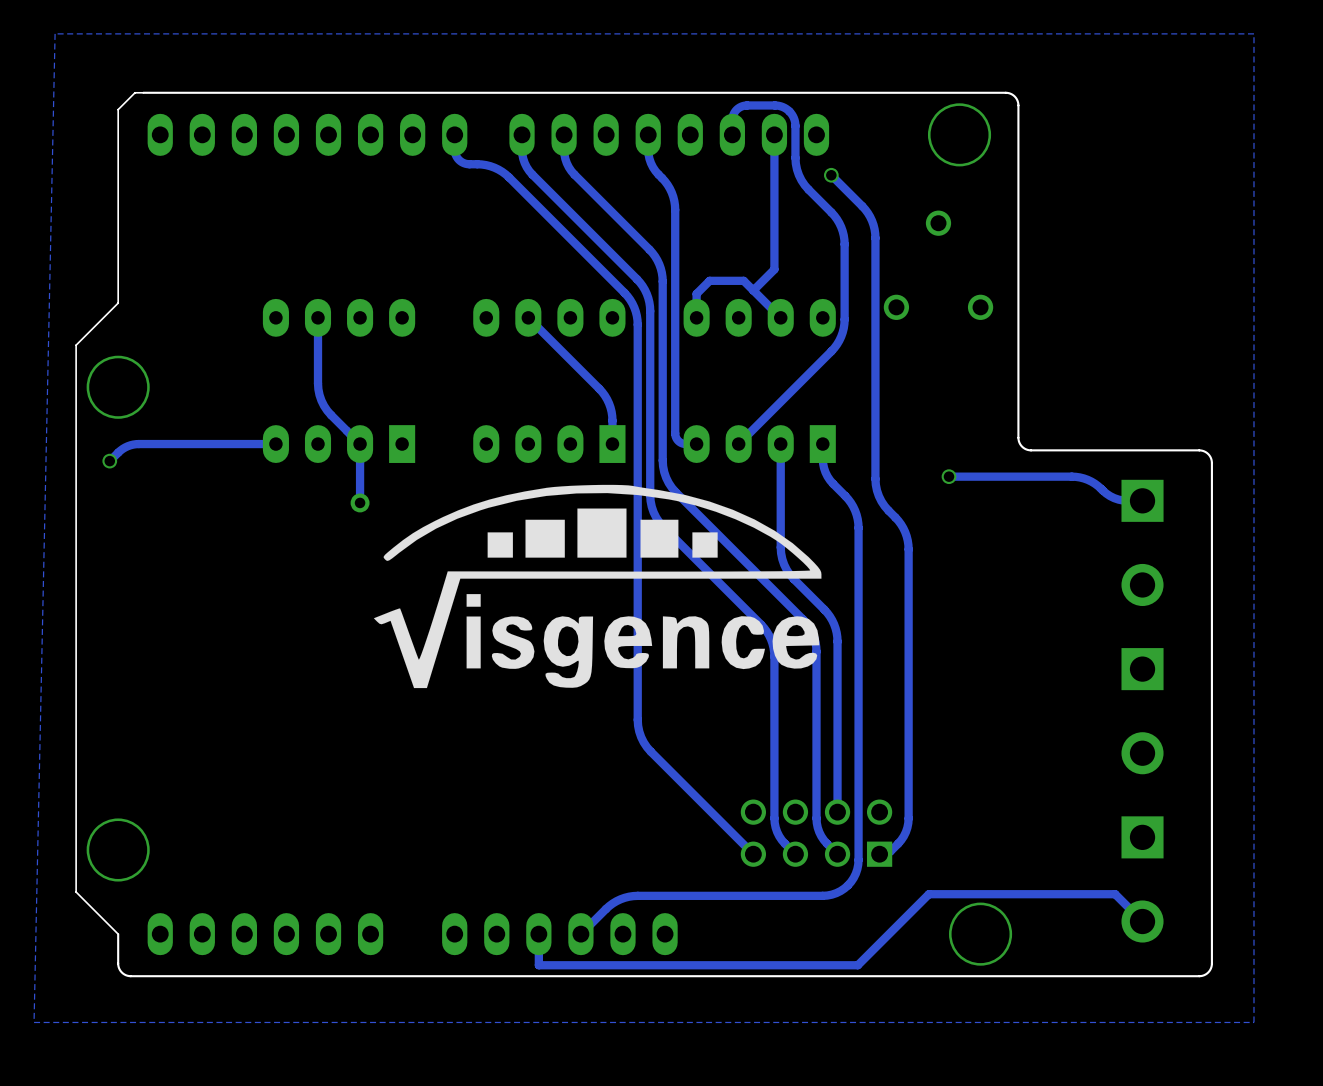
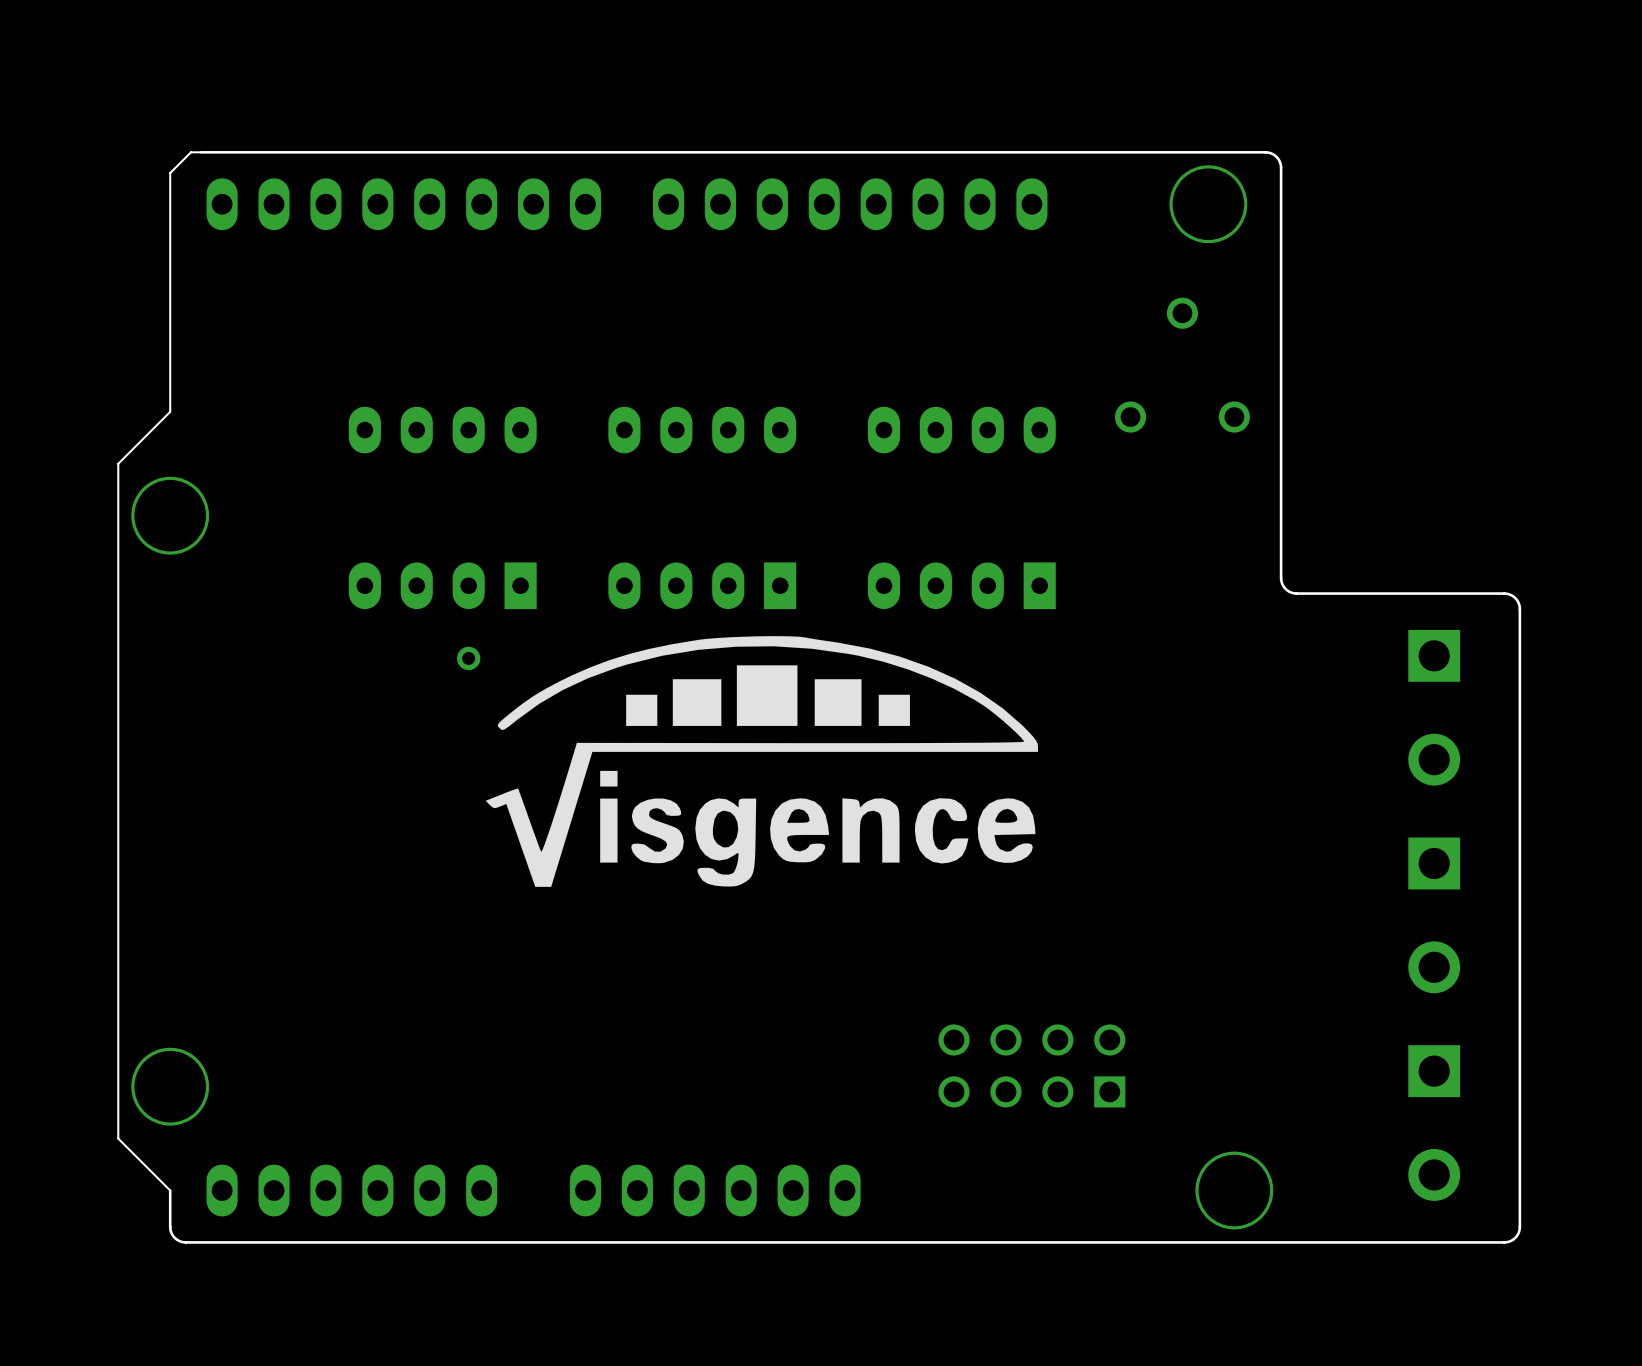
zone outline: (1253, 33) (1253, 1022) (34, 1022) (55, 33) (1253, 33) -> none
track: (454, 134) (454, 151) (459, 159) (465, 163) (490, 166) (505, 174) (624, 292) (634, 307) (637, 324) (639, 731) (643, 742) (650, 751) (753, 854) -> none
track: (522, 134) (523, 158) (529, 171) (637, 279) (646, 293) (650, 311) (651, 506) (656, 517) (663, 526) (761, 624) (770, 639) (774, 656) (774, 822) (779, 836) (795, 854) -> none
track: (564, 134) (565, 158) (571, 171) (649, 249) (660, 268) (662, 281) (662, 460) (664, 472) (668, 483) (803, 619) (813, 634) (816, 651) (816, 822) (821, 836) (837, 854) -> none
track: (648, 134) (648, 154) (650, 163) (669, 188) (674, 205) (675, 434) (681, 443) (696, 444) -> none
track: (732, 134) (732, 116) (741, 106) (776, 105) (789, 111) (795, 121) (795, 163) (798, 175) (804, 185) (837, 219) (842, 231) (844, 244) (844, 323) (839, 340) (831, 351) (738, 444) -> none
track: (774, 134) (774, 269) (753, 290) -> none
track: (831, 175) (865, 209) (874, 229) (875, 484) (881, 501) (903, 528) (908, 544) (908, 823) (903, 836) (898, 843) (888, 852) (879, 854) -> none
via: (831, 175) -> none
track: (318, 317) (319, 394) (327, 410) (349, 434) (356, 445) (359, 458) (360, 502) -> none
track: (528, 317) (604, 395) (611, 411) (612, 444) -> none
track: (780, 317) (743, 280) (709, 280) (696, 293) (696, 317) -> none
track: (275, 444) (136, 444) (122, 448) (109, 461) -> none
track: (780, 444) (782, 559) (790, 574) (829, 616) (836, 632) (837, 812) -> none
track: (822, 444) (823, 463) (825, 472) (830, 480) (850, 502) (858, 523) (858, 859) (853, 877) (844, 888) (827, 895) (629, 896) (609, 906) (580, 934) -> none
via: (109, 461) -> none
track: (949, 476) (1075, 476) (1091, 481) (1114, 498) (1123, 500) (1142, 500) -> none
via: (949, 476) -> none
track: (1142, 921) (1115, 894) (928, 894) (857, 965) (538, 965) (538, 934) -> none

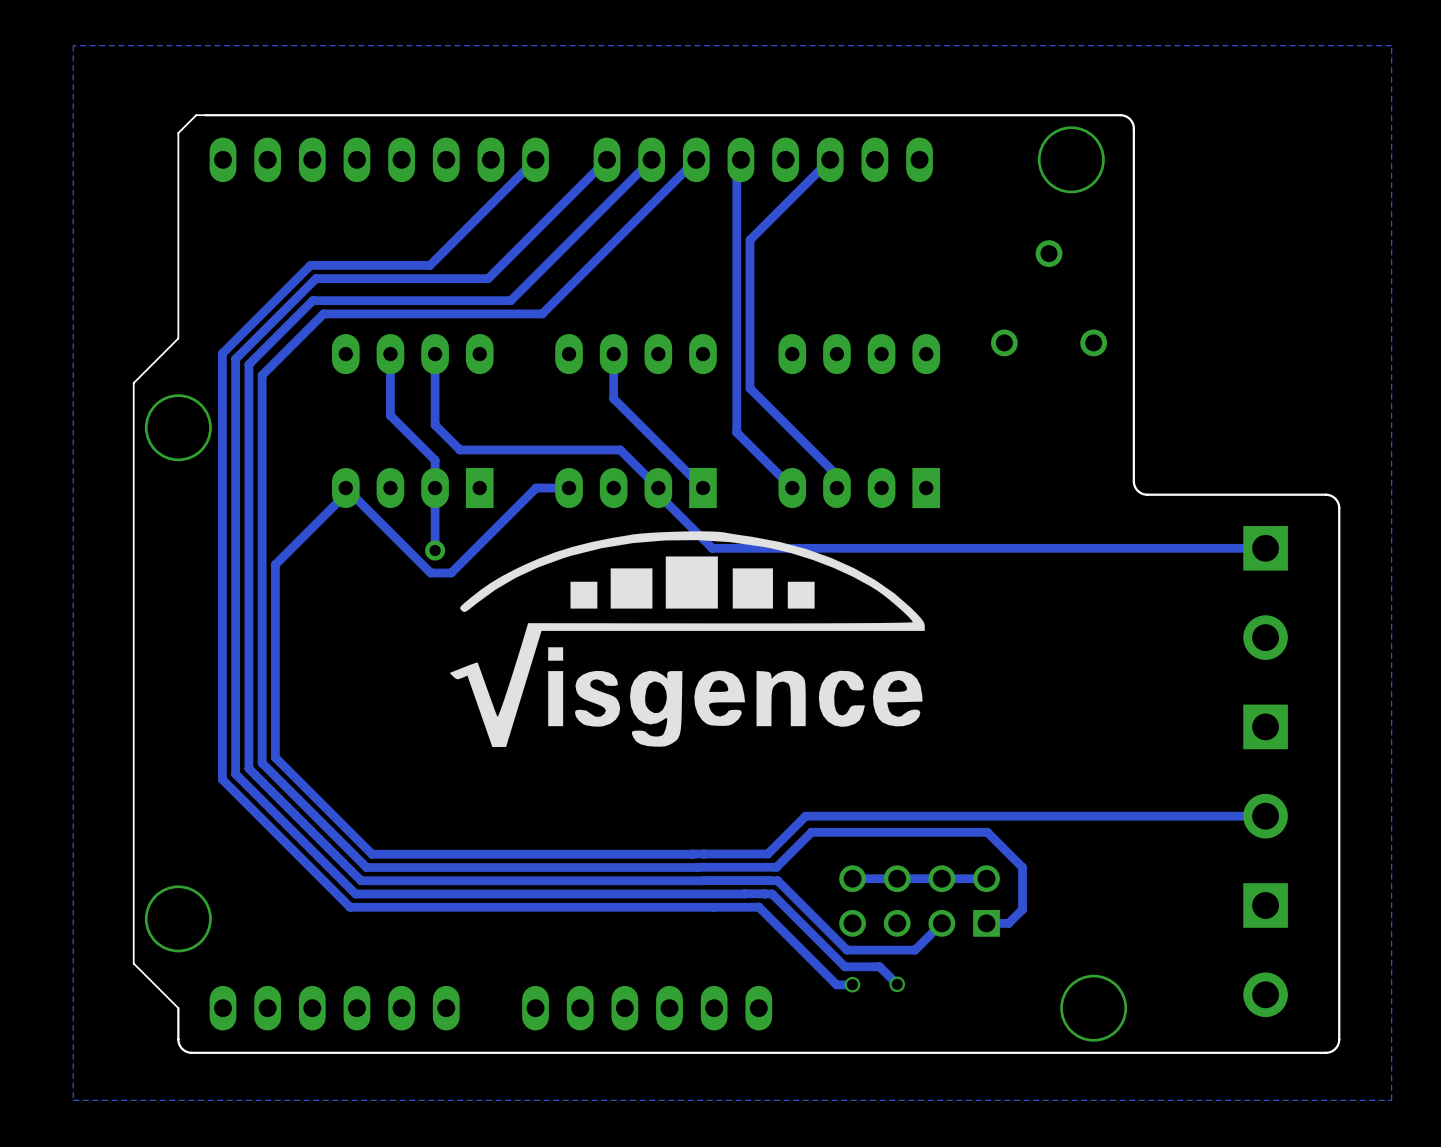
zone outline: none -> (1391, 45) (1391, 1100) (73, 1100) (73, 45) (1391, 45)
track: none -> (535, 159) (430, 265) (310, 265) (222, 353) (222, 779) (350, 907) (758, 907)
track: none -> (607, 159) (488, 278) (316, 278) (235, 359) (235, 774) (355, 894) (744, 894)
track: none -> (651, 159) (510, 300) (312, 300) (248, 364) (248, 768) (361, 880) (703, 880)
track: none -> (696, 159) (542, 313) (323, 313) (262, 375) (262, 763) (366, 867) (698, 867)
track: none -> (740, 159) (736, 164) (736, 432) (792, 488)
track: none -> (830, 159) (750, 240) (750, 388) (836, 475) (836, 488)
track: none -> (390, 354) (390, 415) (435, 460) (435, 550)
track: none -> (435, 354) (435, 425) (459, 449) (620, 449) (658, 488) (658, 494) (712, 548) (1265, 548)
track: none -> (613, 354) (613, 398) (702, 488)
track: none -> (569, 488) (536, 488) (451, 573) (430, 573) (345, 488) (345, 494) (275, 564) (275, 757) (372, 854) (692, 854)
track: none -> (1265, 816) (805, 816) (767, 854) (692, 854)
track: none -> (698, 867) (776, 867) (811, 832) (987, 832) (1022, 867) (1022, 909) (1008, 923) (986, 923)
track: none -> (986, 878) (852, 878)
track: none -> (769, 880) (703, 880)
track: none -> (770, 880) (777, 880) (847, 950) (915, 950) (941, 923)
track: none -> (764, 893) (744, 893)
track: none -> (764, 894) (772, 894) (844, 966) (879, 966) (897, 984)
track: none -> (758, 907) (836, 984) (852, 984)
via: none -> (897, 984)
via: none -> (852, 984)

